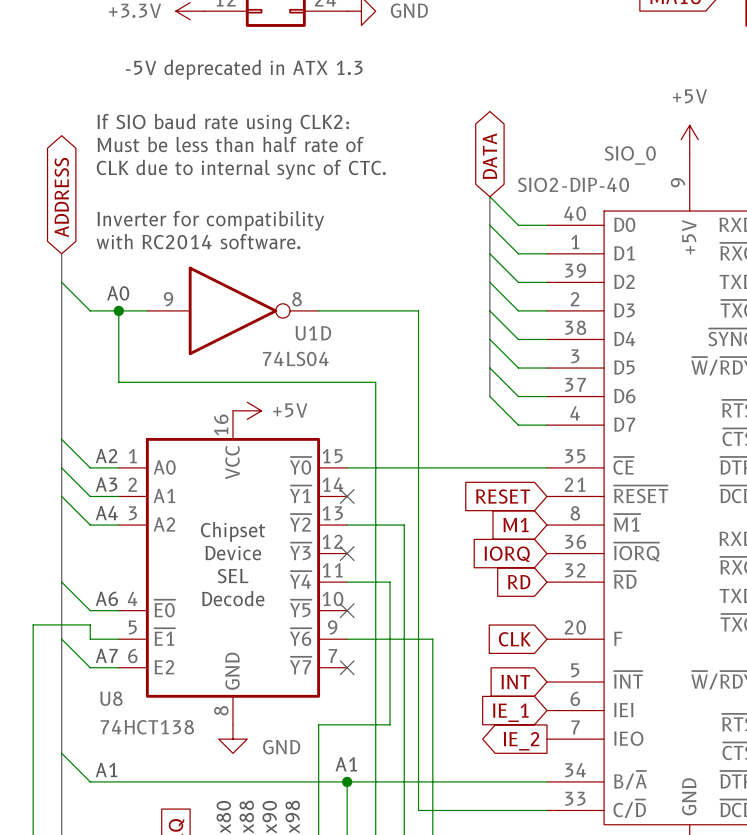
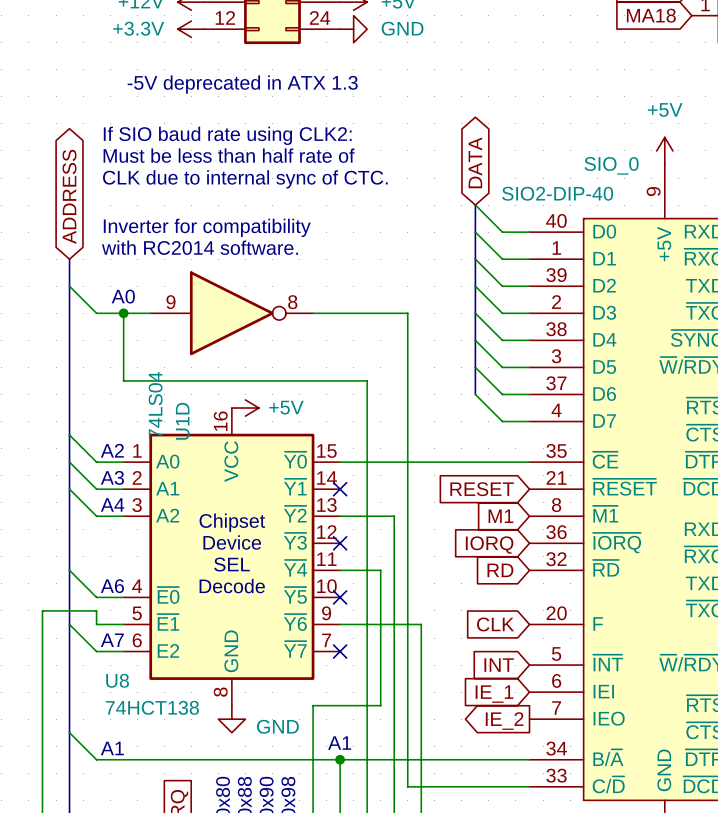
U1D name rotation: 0° (313, 333) -> 90° counterclockwise (182, 421)
U1D name position: U1D (313, 333) -> U1D (182, 421)
U1D value rotation: 0° (295, 359) -> 90° counterclockwise (155, 405)
U1D value position: 74LS04 (295, 359) -> 74LS04 (155, 405)

